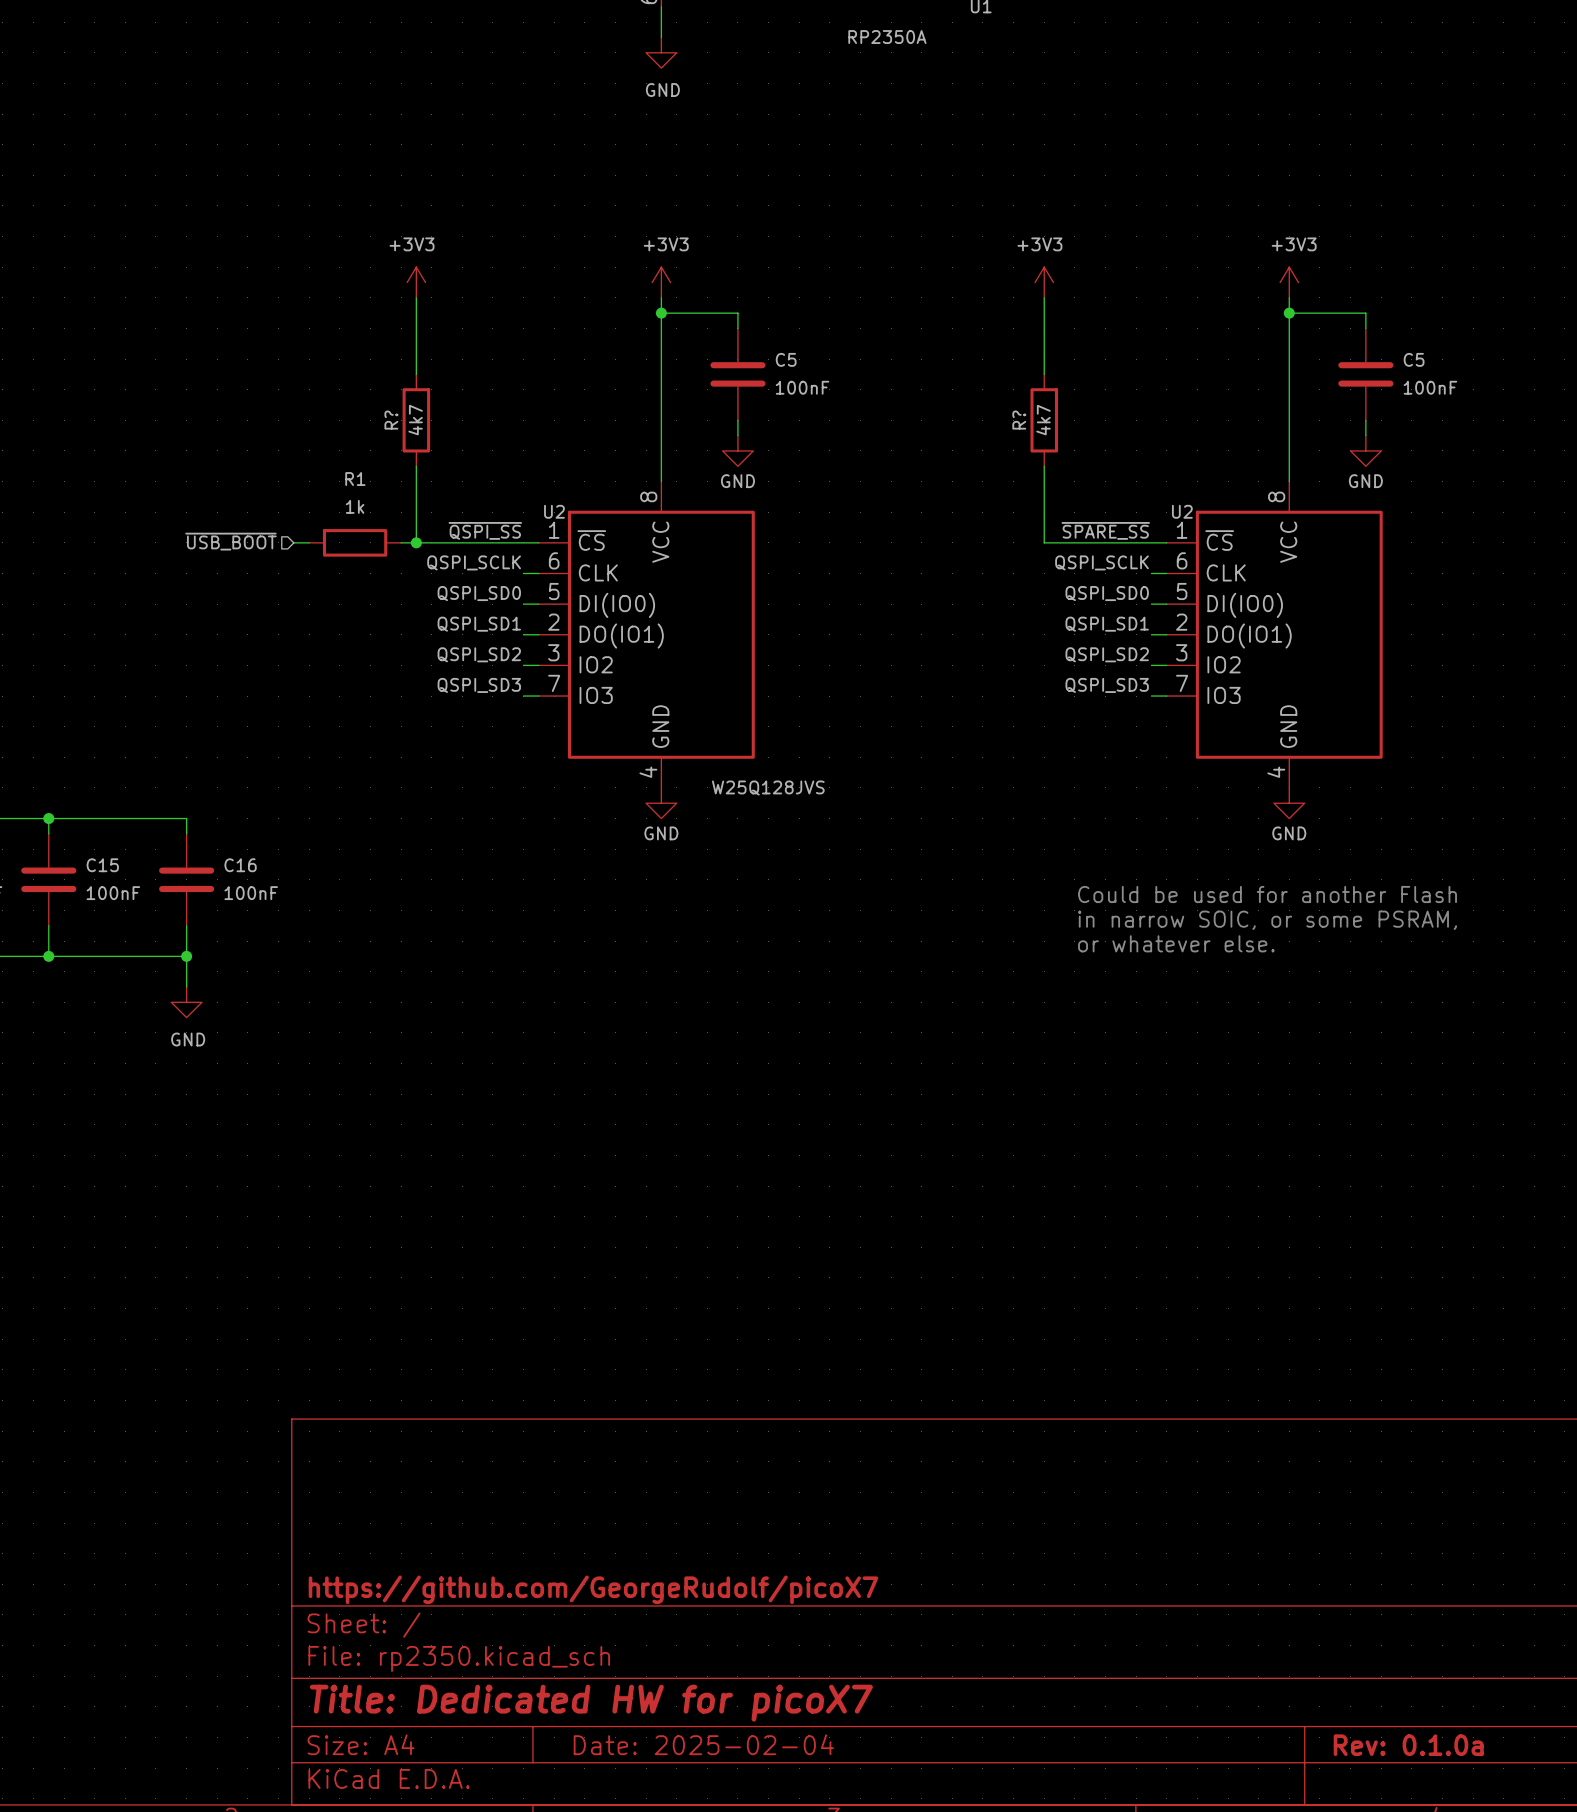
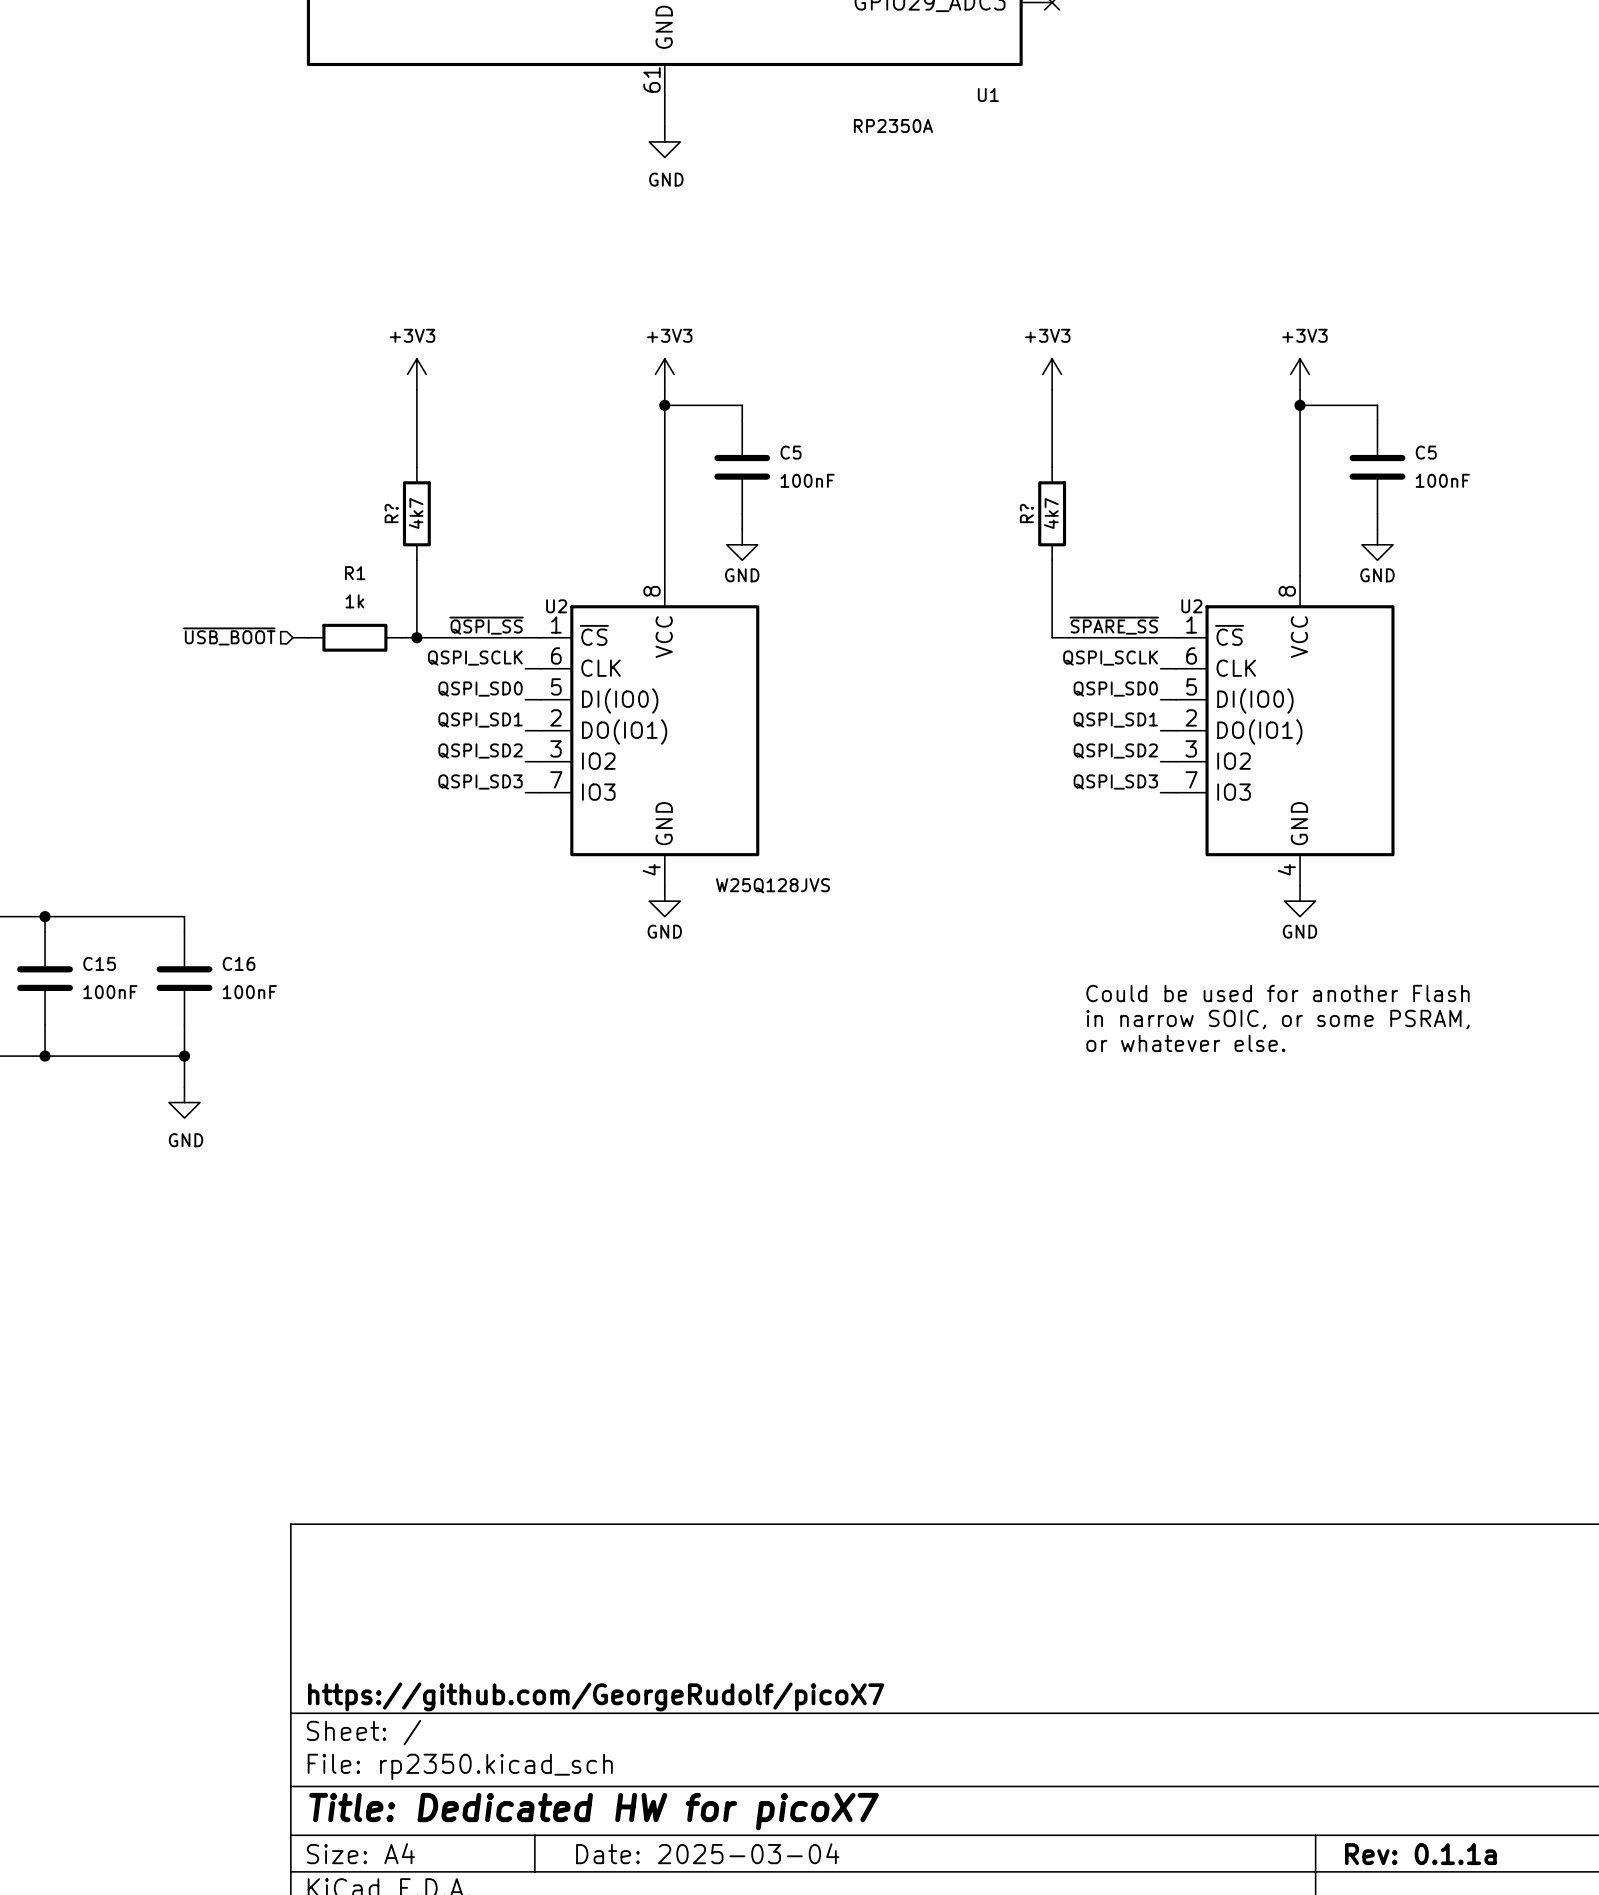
title block: Date: 2025-02-04 (703, 1744) -> Date: 2025-03-04 (707, 1853)
title block: Rev: 0.1.0a (1408, 1745) -> Rev: 0.1.1a (1420, 1854)

